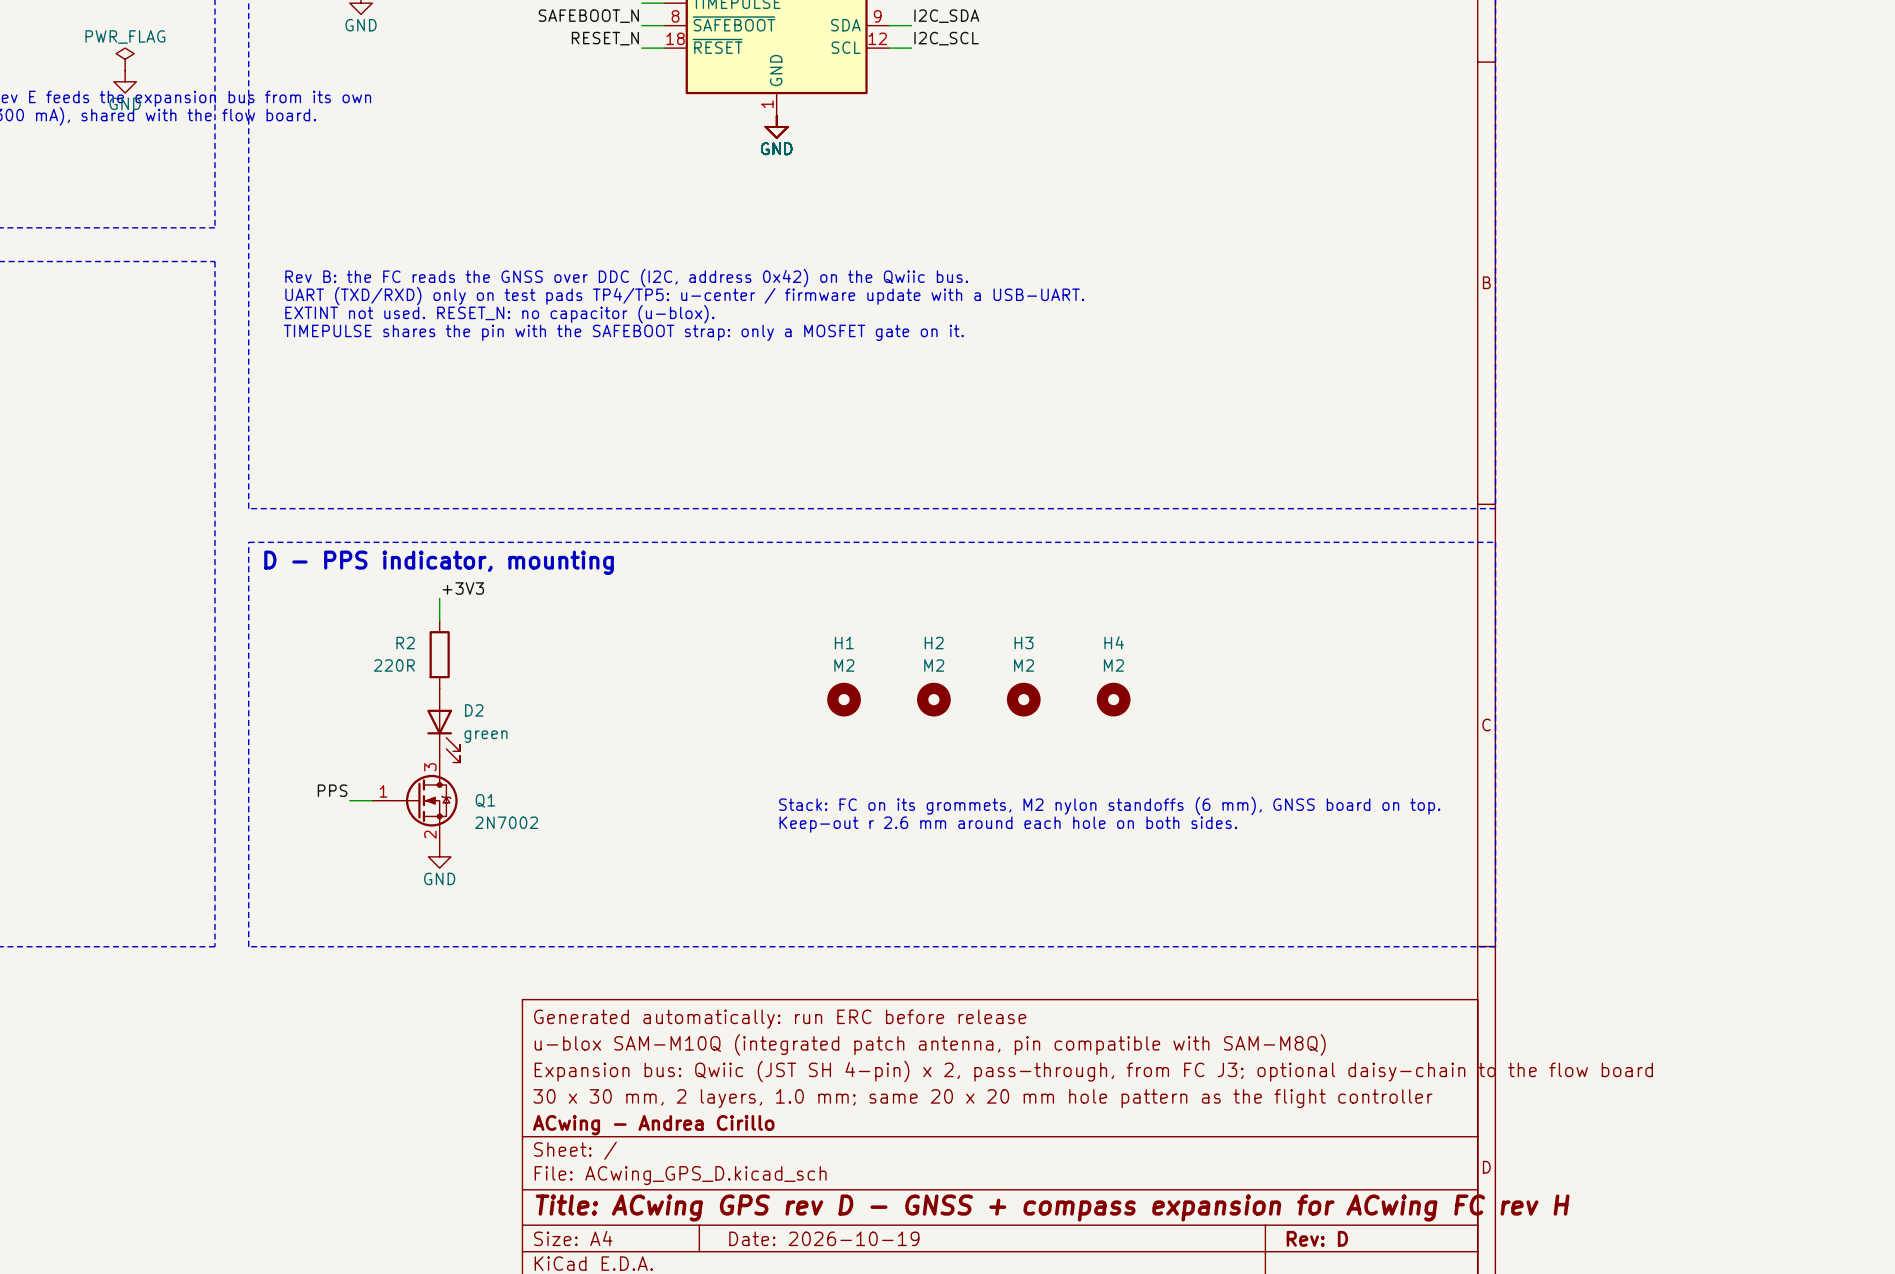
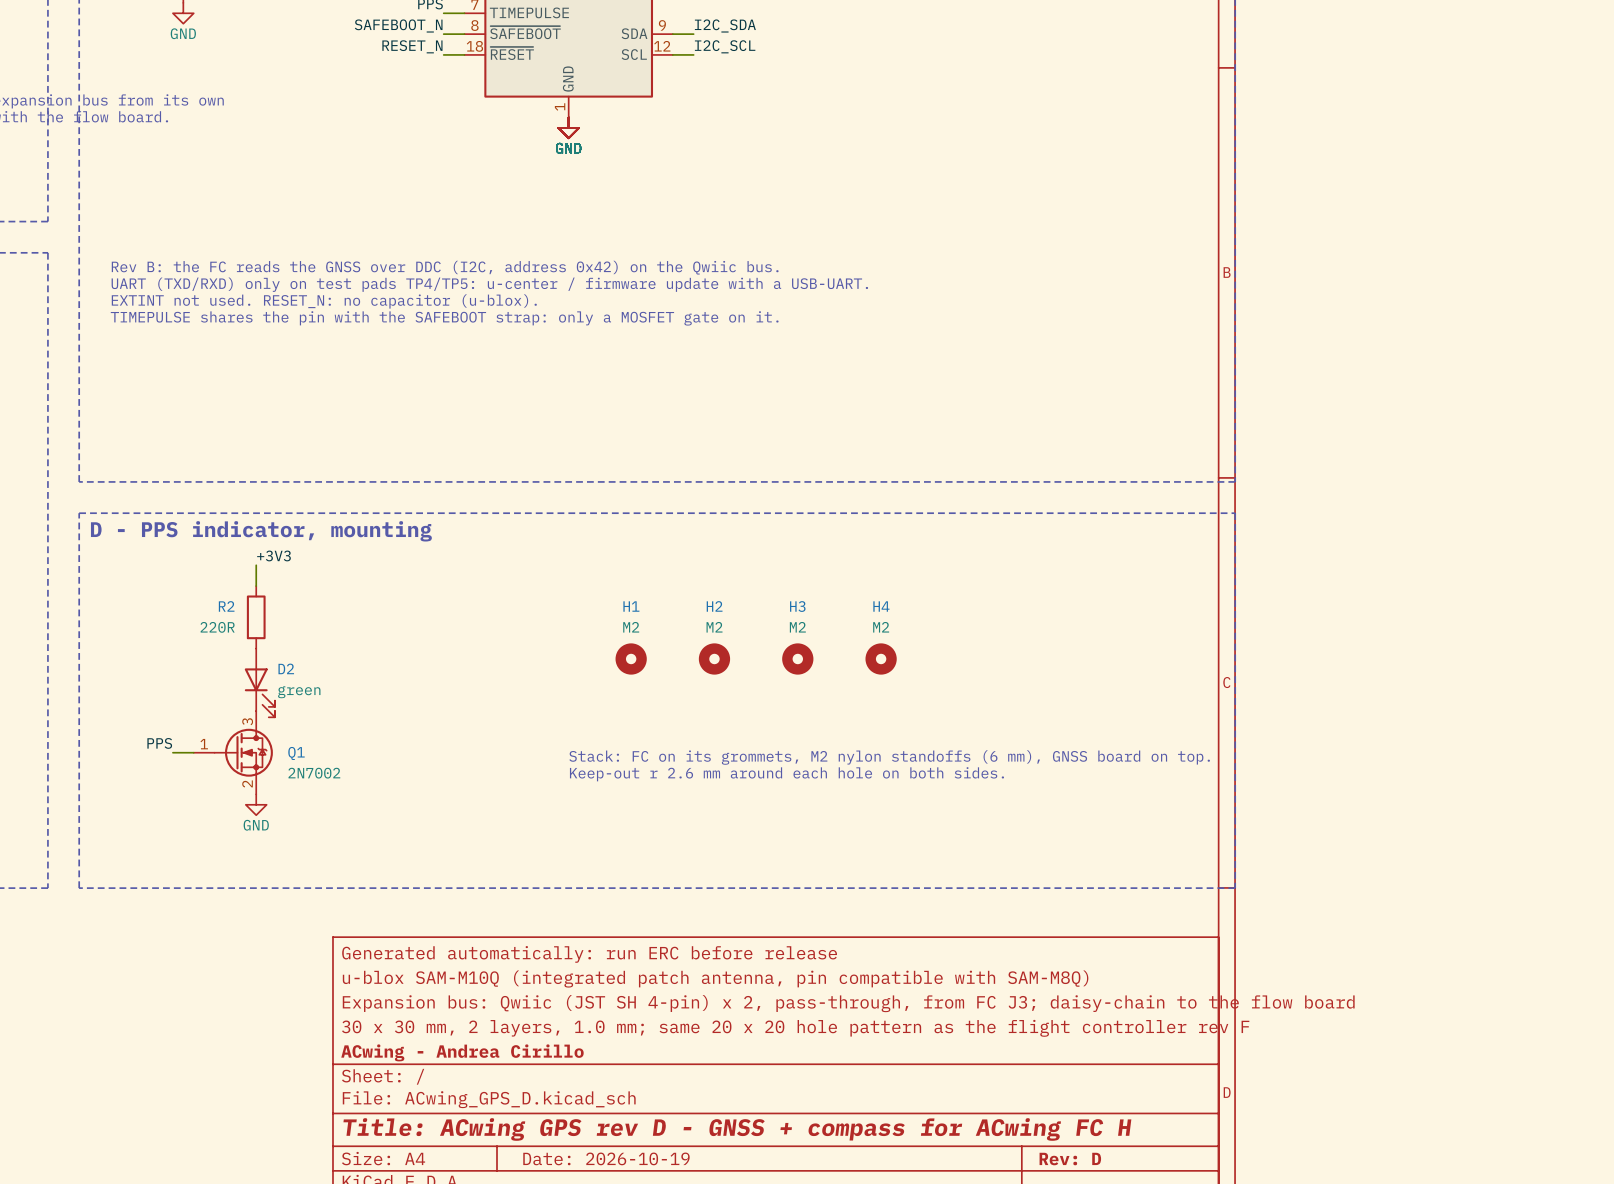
title block: Expansion bus: Qwiic (JST SH 4-pin) x 2, pass-through, from FC J3; optional daisy-chain to the flow board (1093, 1071) -> Expansion bus: Qwiic (JST SH 4-pin) x 2, pass-through, from FC J3; daisy-chain to the flow board (848, 1003)
title block: 30 x 30 mm, 2 layers, 1.0 mm; same 20 x 20 mm hole pattern as the flight controller (982, 1098) -> 30 x 30 mm, 2 layers, 1.0 mm; same 20 x 20 hole pattern as the flight controller rev F (795, 1028)
title block: Title: ACwing GPS rev D - GNSS + compass expansion for ACwing FC rev H (1052, 1207) -> Title: ACwing GPS rev D - GNSS + compass for ACwing FC H (737, 1129)

